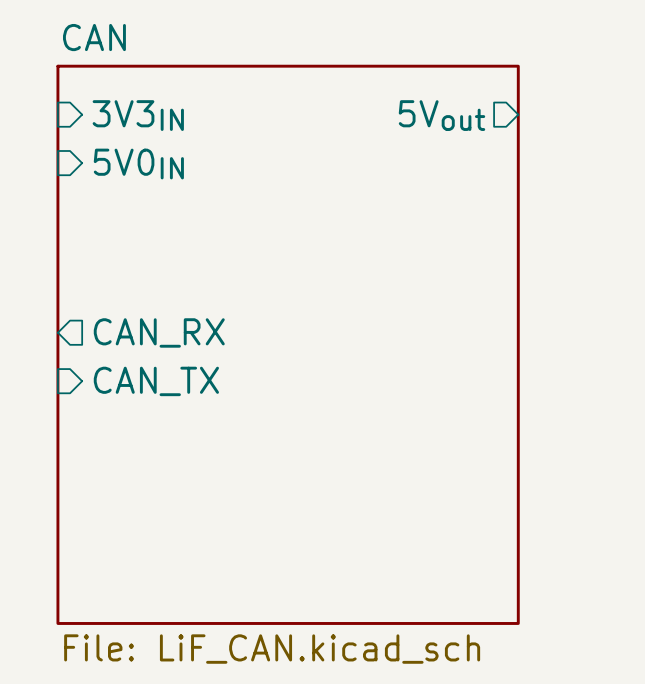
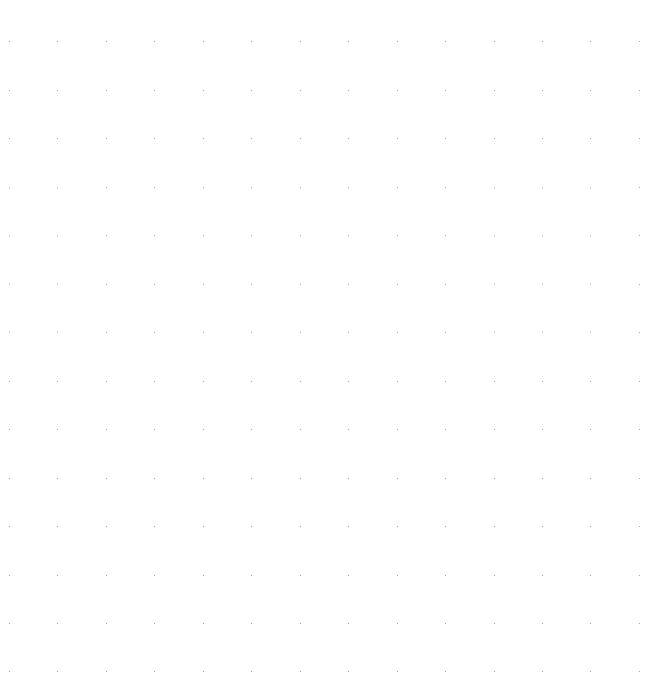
sheet pin: 3V3IN (138, 115) -> none
sheet pin: 5Vout (442, 115) -> none
sheet pin: 5V0IN (138, 164) -> none
sheet pin: CAN_RX (159, 332) -> none
sheet CAN: File: LiF_CAN.kicad_sch (288, 344) -> none
sheet pin: CAN_TX (156, 381) -> none

